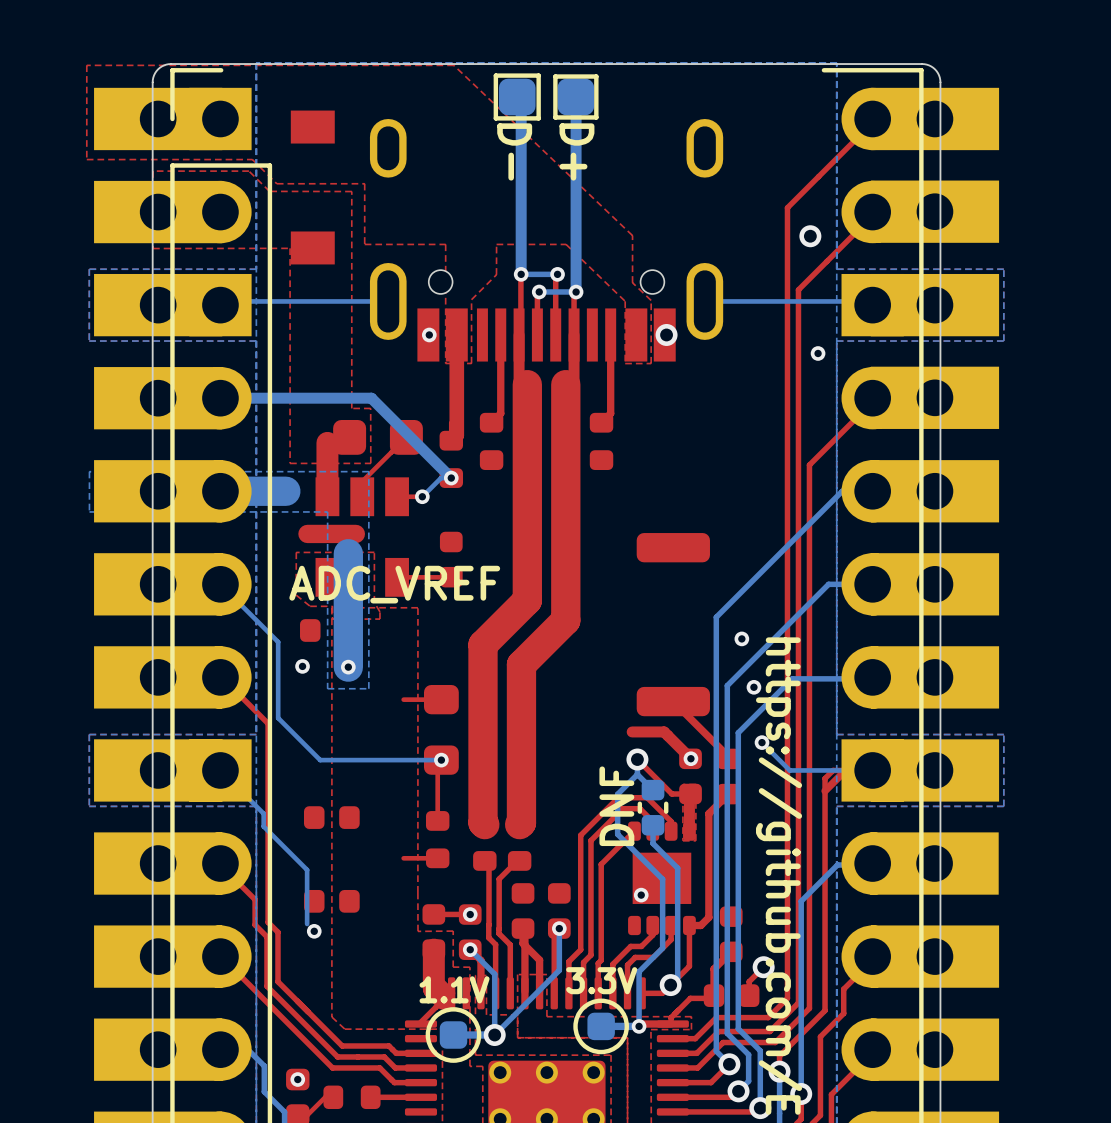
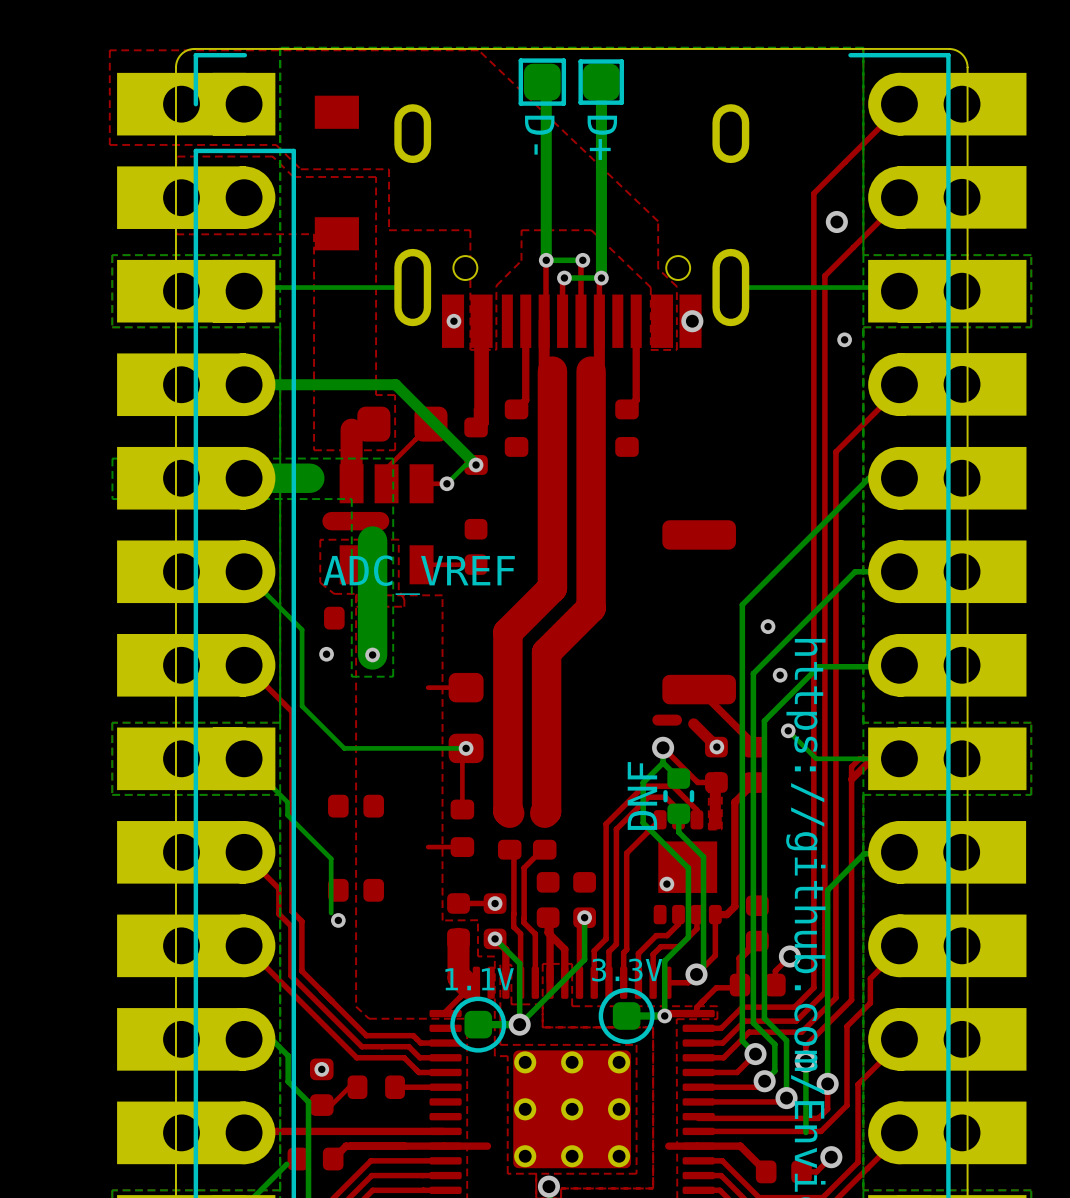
top track: (650, 731) (664, 731) (667, 735) -> none

